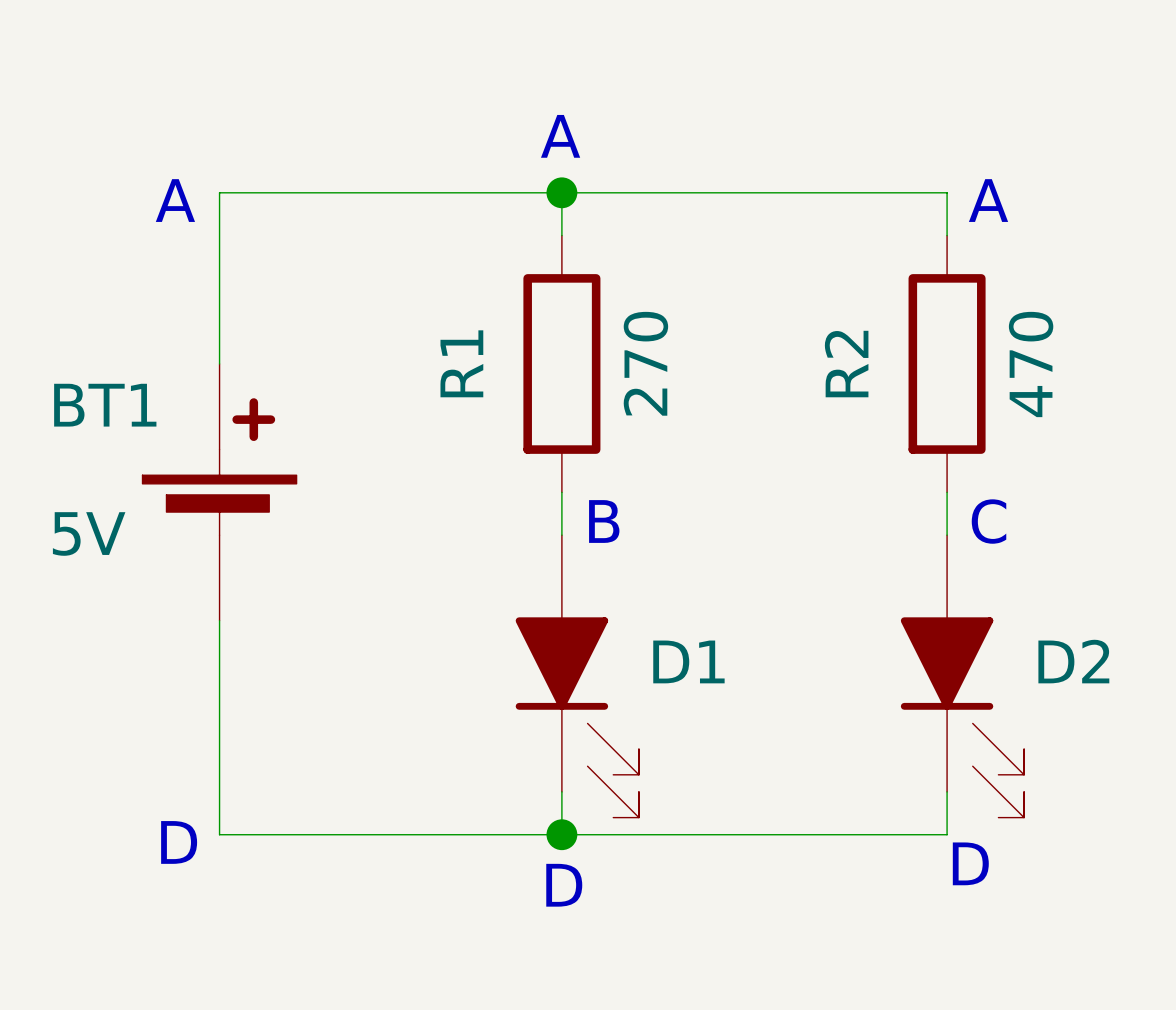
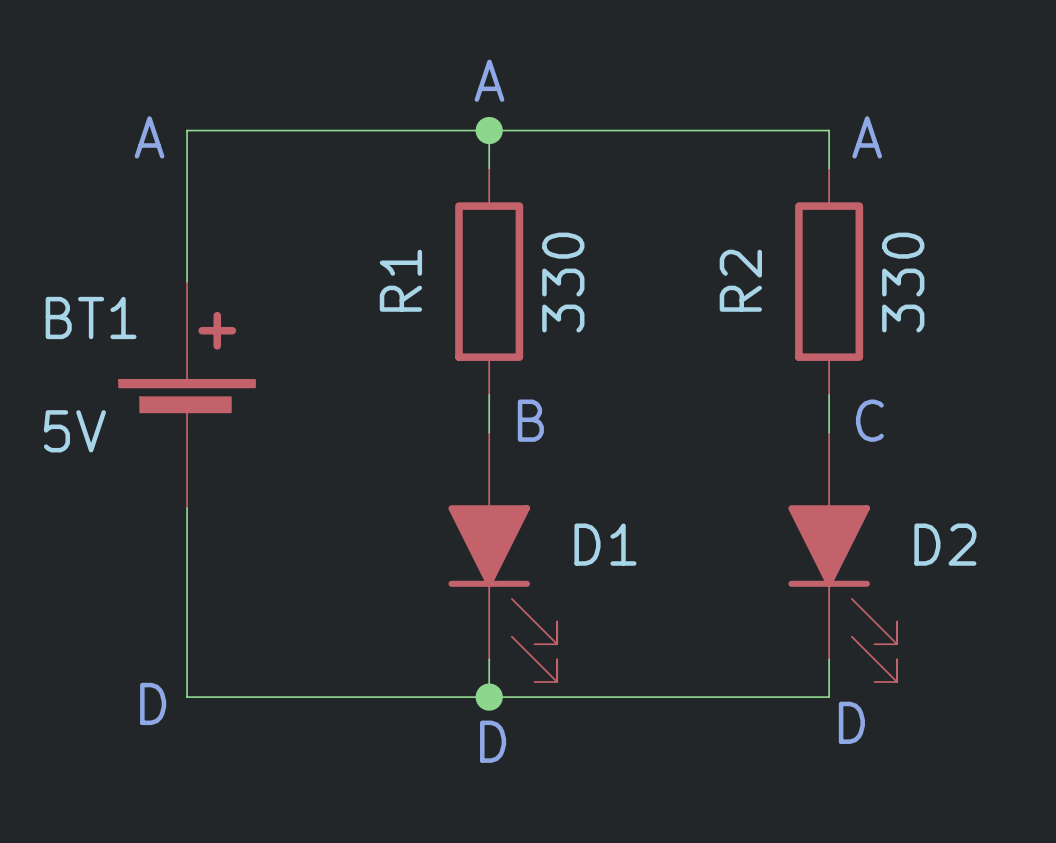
R1 value: 270 (645, 363) -> 330 (563, 282)
R2 value: 470 (1031, 364) -> 330 (903, 282)

